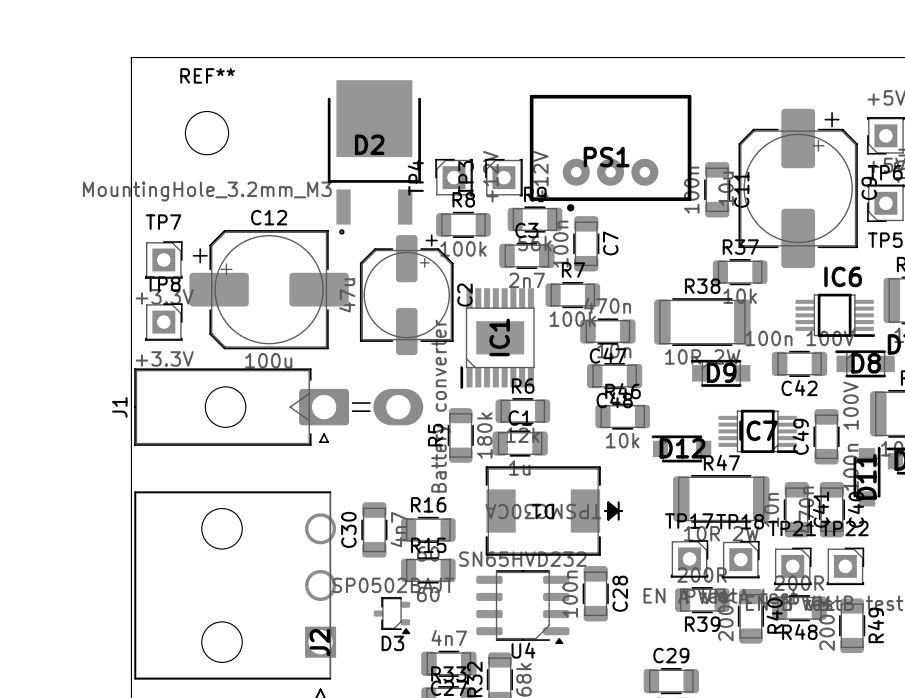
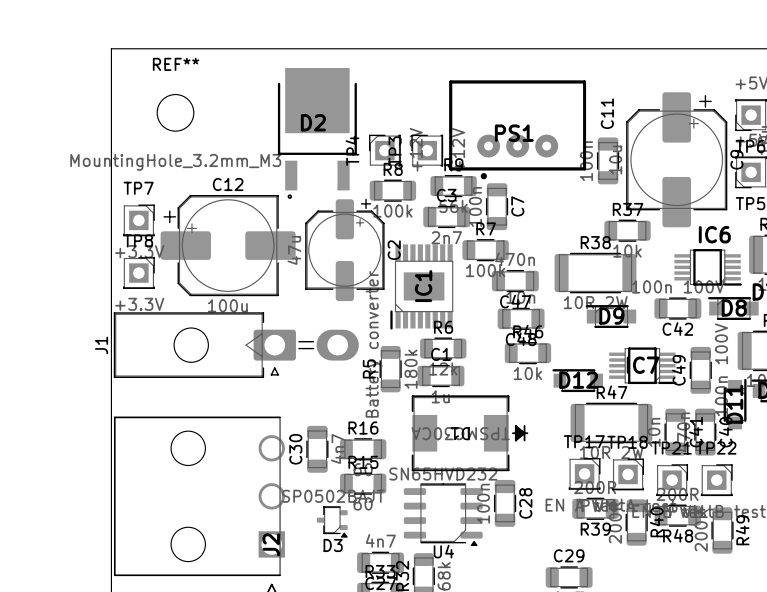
C11 name position: C11 (741, 189) -> C11 (607, 113)

